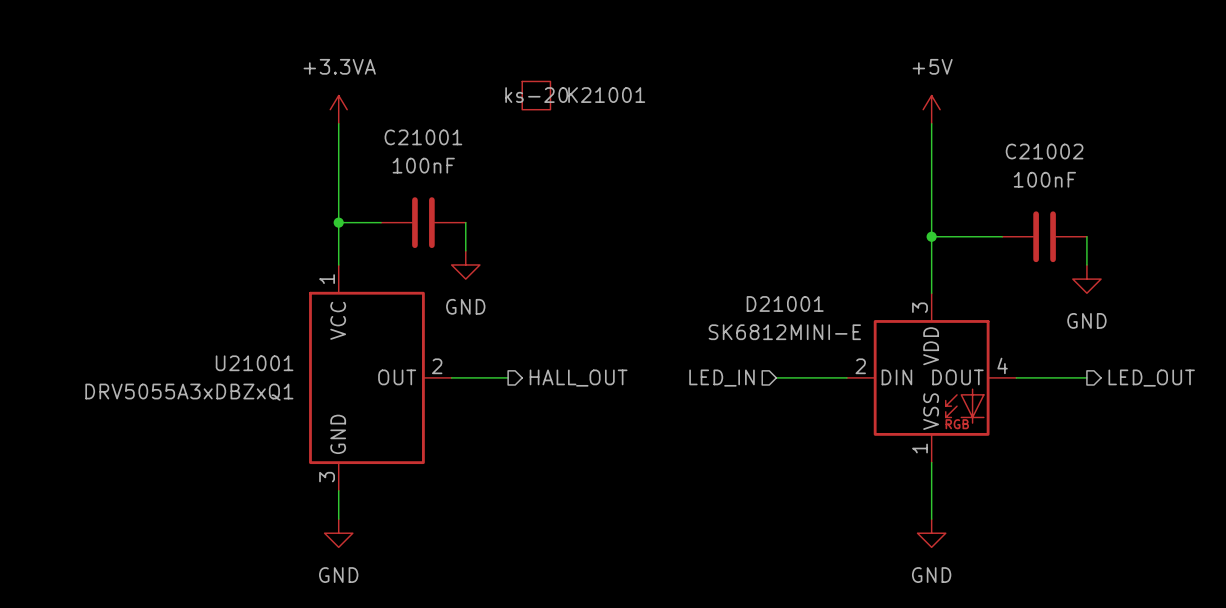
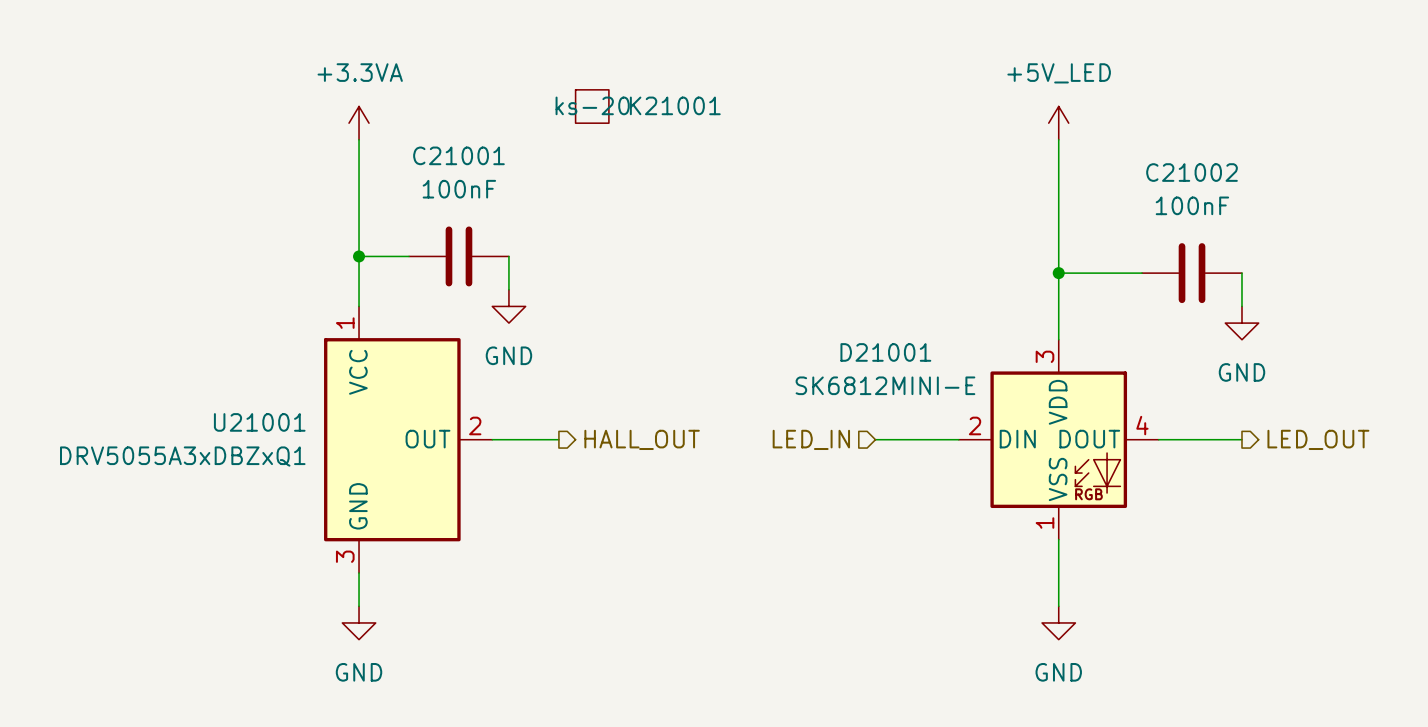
power symbol: +5V (931, 109) -> +5V_LED (1058, 123)

